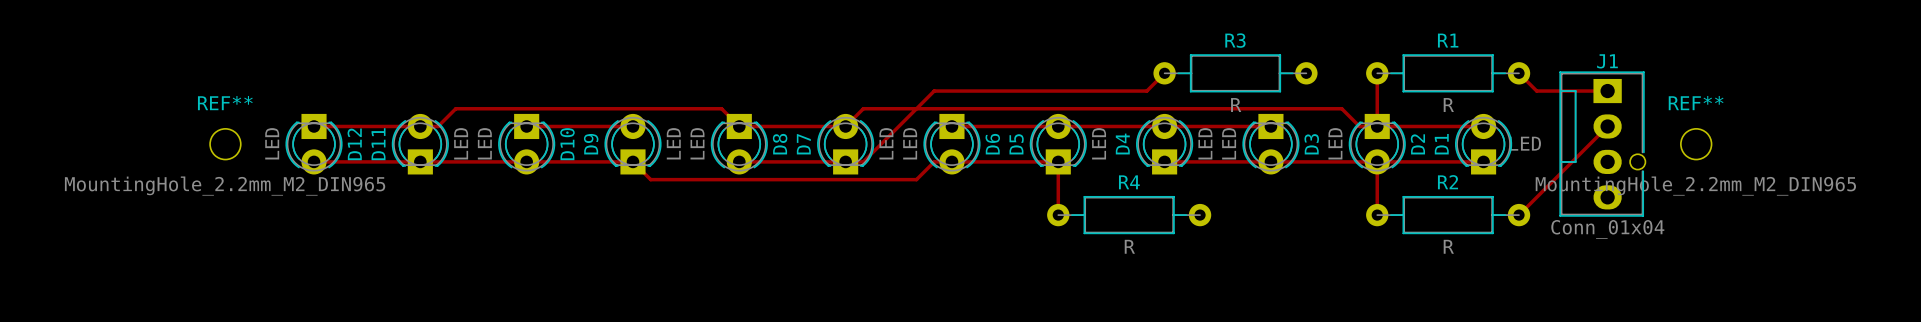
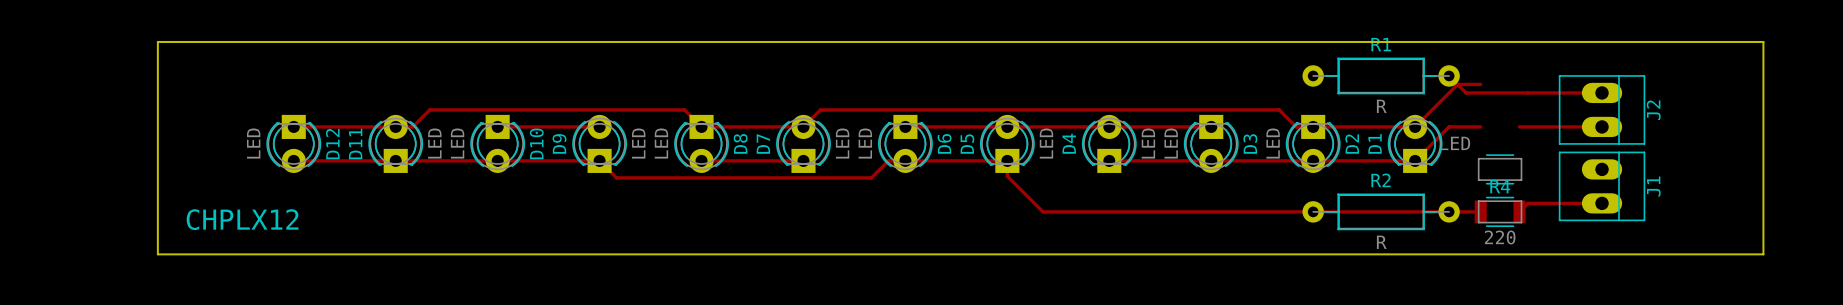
board edge: none -> (157, 41) (157, 254) (1763, 254) (1763, 41) (157, 41)
J1 name position: J1 (1607, 61) -> J1 (1653, 186)
J1 footprint: [1559, 71, 1646, 217] -> [1558, 151, 1646, 222]
track: (1164, 73) (1146, 91) (934, 91) (863, 161) (845, 161) -> none
R3: R (1235, 73) -> none
track: (1377, 73) (1377, 126) -> none
track: none -> (1480, 84) (1457, 84) (1415, 126)
track: none -> (1534, 92) (1602, 92)
J2: none -> (1602, 109)
track: none -> (1480, 126) (1449, 126) (1415, 160)
track: none -> (1519, 126) (1602, 126)
track: (1607, 126) (1519, 215) -> none
REF**: MountingHole_2.2mm_M2_DIN965 (225, 144) -> none
REF**: MountingHole_2.2mm_M2_DIN965 (1696, 144) -> none
track: (1377, 161) (1377, 215) -> none
part: none -> (1500, 169)
track: (1058, 177) (1058, 215) -> (1007, 176) (1042, 211) (1480, 211)
R4 footprint: [1047, 195, 1212, 235] -> [1474, 196, 1526, 228]
track: none -> (1602, 203) (1527, 203) (1519, 211)
text: none -> CHPLX12 (242, 219)
J1 value: Conn_01x04 (1607, 229) -> none
R4 value: R (1129, 246) -> 220 (1500, 237)

